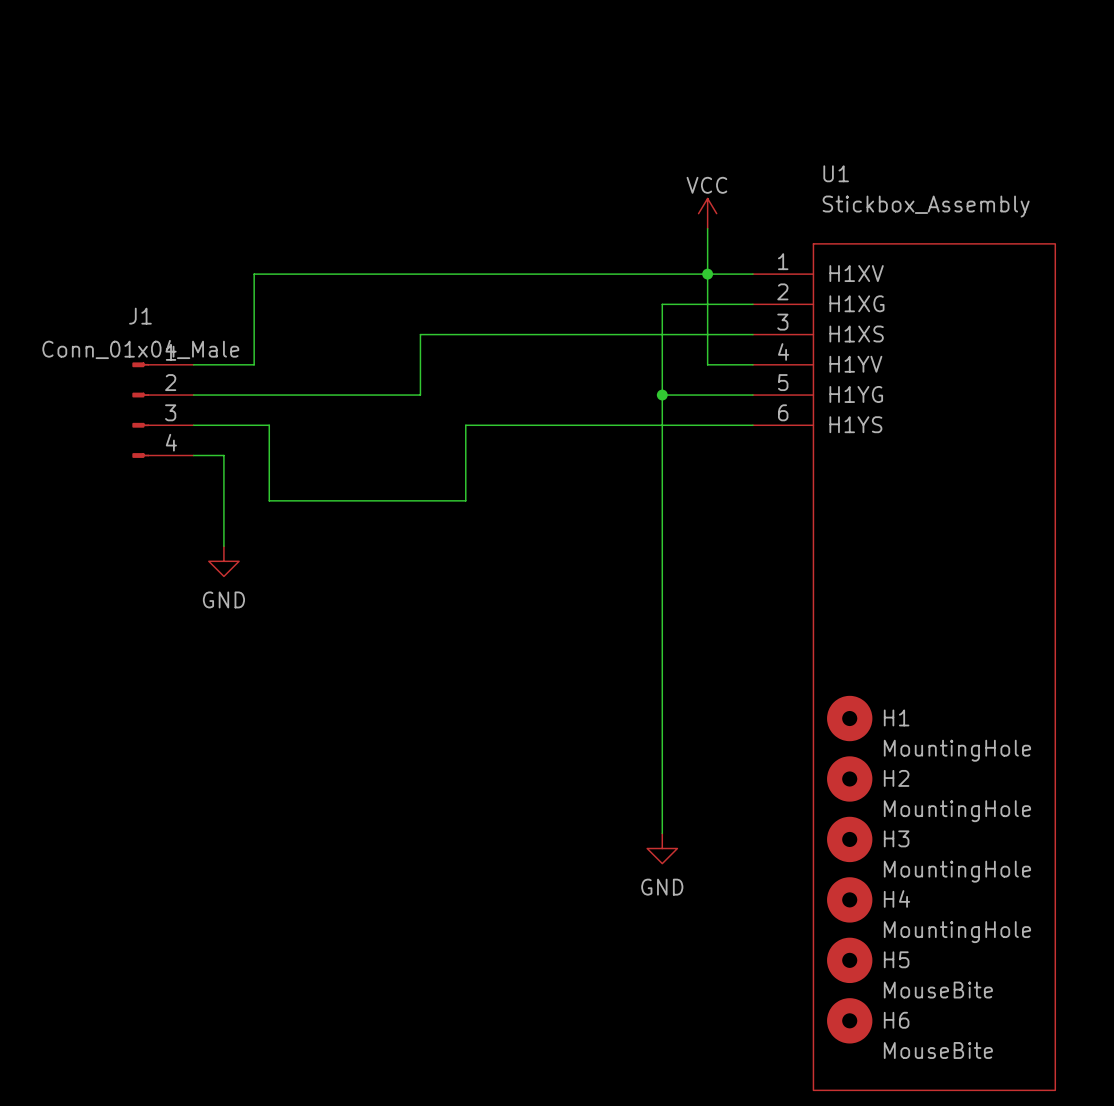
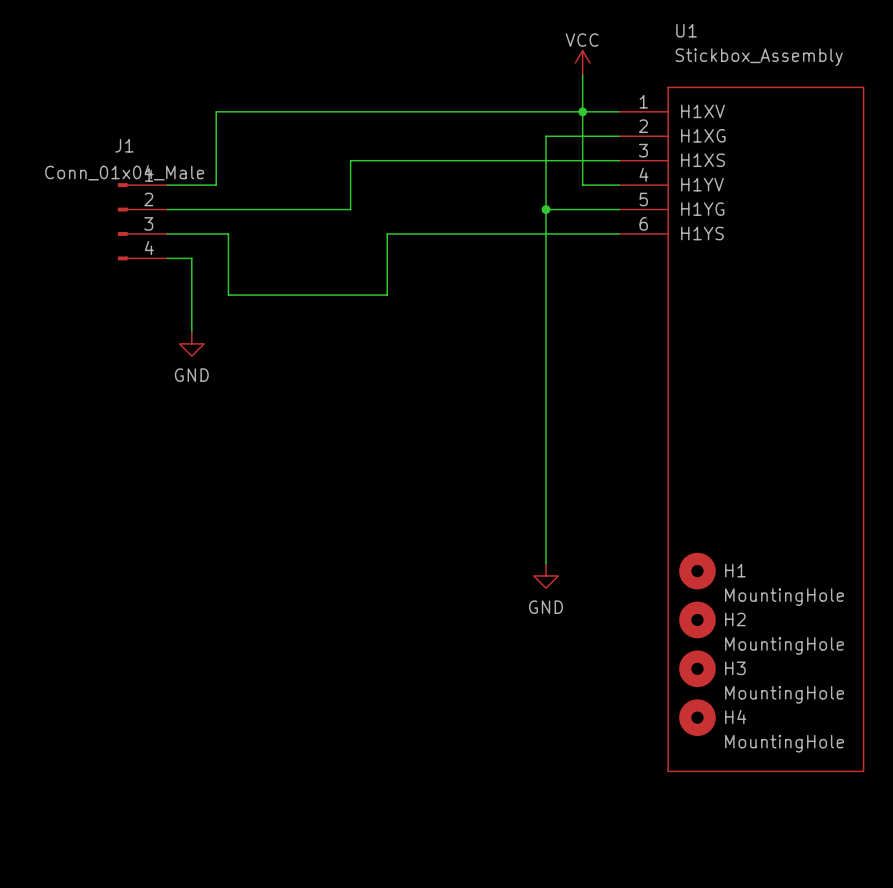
wire: none -> (582, 75) (582, 175)
junction: none -> (582, 111)
power symbol position: VCC (707, 213) -> VCC (582, 62)
wire: (707, 240) (707, 364) (752, 364) -> (582, 185) (619, 185)
junction position: (707, 274) -> (546, 209)
wire: (752, 274) (254, 274) (254, 364) (193, 364) -> (619, 111) (216, 111) (216, 185) (167, 185)
wire: (662, 304) (752, 304) -> (546, 236) (546, 136) (619, 136)
wire: (752, 334) (420, 334) (420, 395) (193, 395) -> (619, 160) (350, 160) (350, 209) (167, 209)
wire: (662, 395) (752, 395) -> (546, 209) (619, 209)
junction: (662, 395) -> none
J1 position: (163, 410) -> (142, 221)
wire: (193, 425) (269, 425) (269, 500) (465, 500) (465, 425) (752, 425) -> (167, 233) (228, 233) (228, 295) (387, 295) (387, 233) (619, 233)
wire: (193, 455) (223, 455) (223, 546) -> (167, 258) (191, 258) (191, 331)
power symbol position: GND (223, 561) -> GND (191, 343)
U1 position: (904, 667) -> (741, 429)
wire: (662, 709) (662, 833) -> none
power symbol position: GND (662, 848) -> GND (546, 575)
H5: MouseBite (849, 960) -> none
H6: MouseBite (849, 1020) -> none

